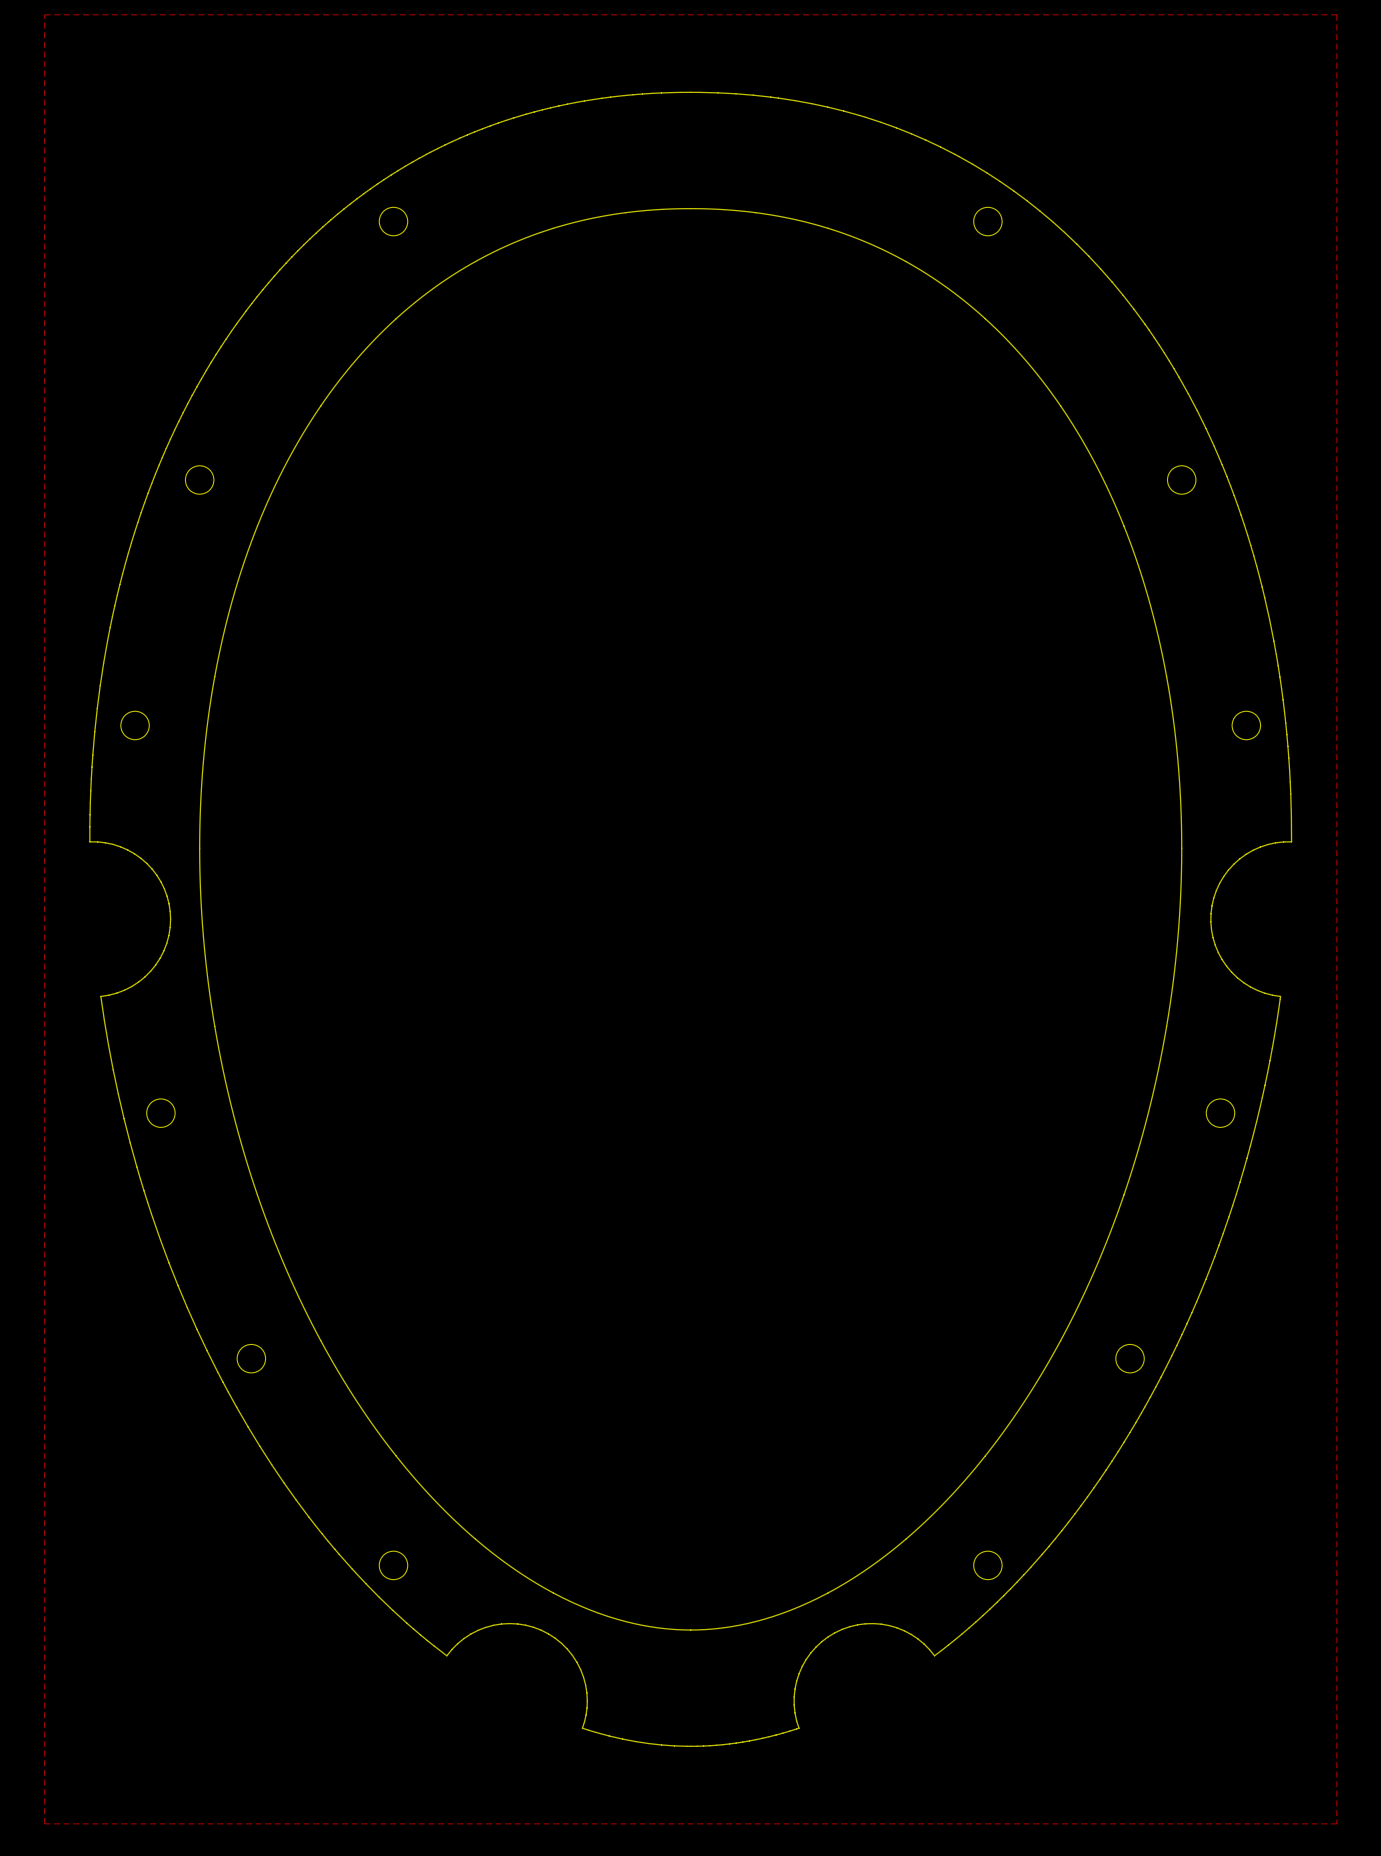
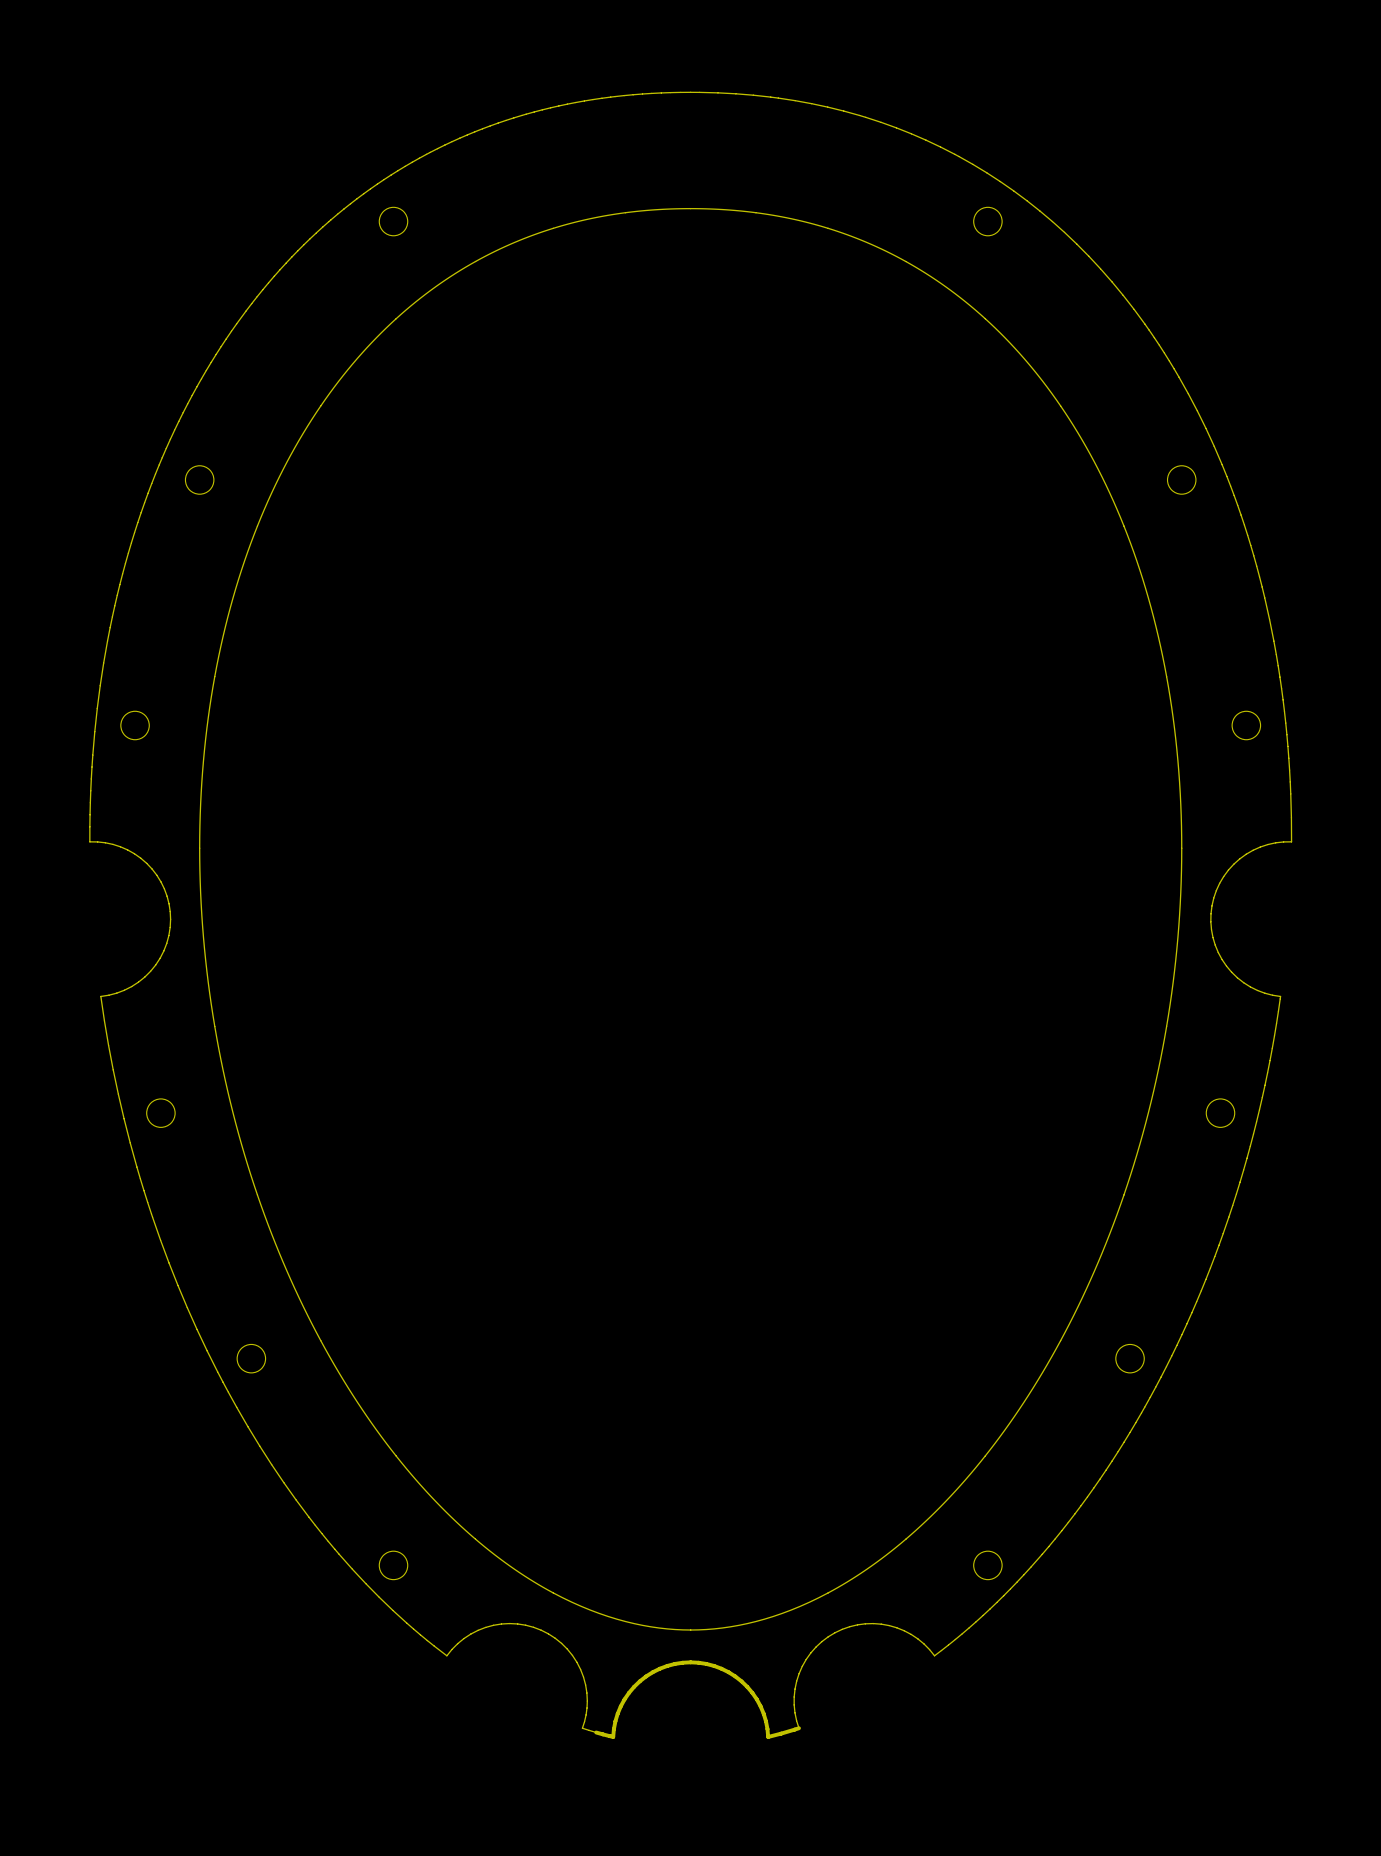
zone outline: (44, 14) (1336, 14) (1336, 1823) (44, 1823) (44, 14) -> none
board edge: (798, 1728) (749, 1740) (697, 1746) (648, 1743) (595, 1732) -> (798, 1728) (768, 1736) (765, 1721) (760, 1706) (752, 1692) (741, 1681) (728, 1672) (714, 1665) (690, 1662) (667, 1665) (646, 1676) (634, 1686) (624, 1699) (617, 1713) (613, 1736) (596, 1732)

